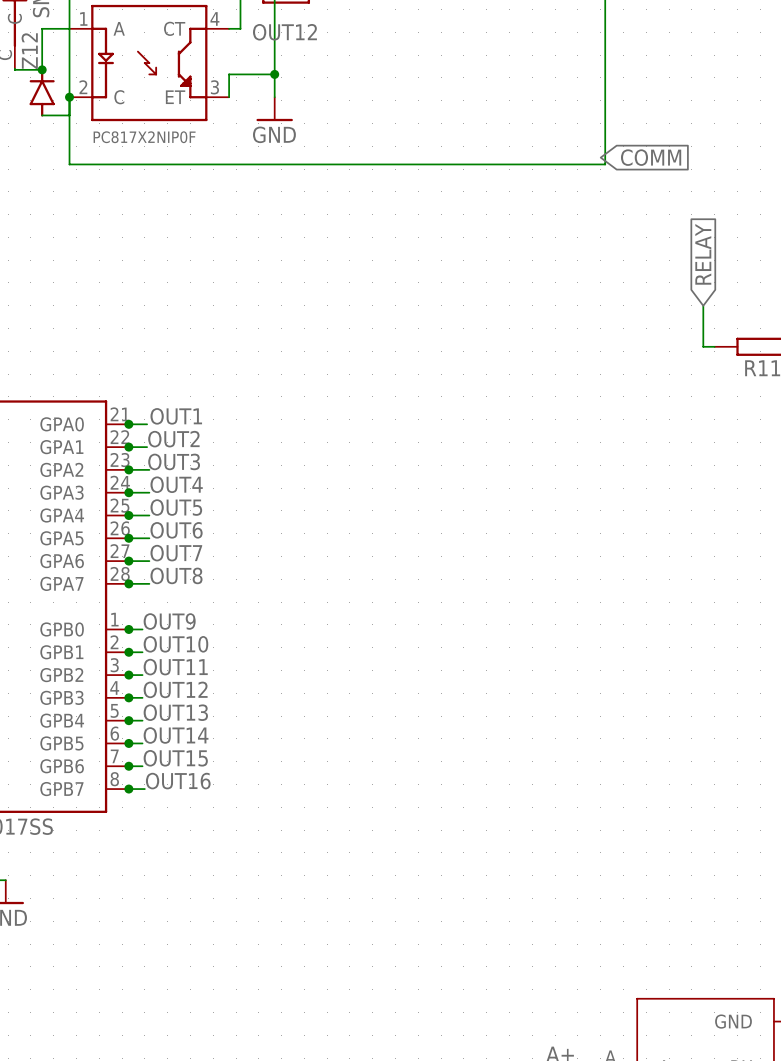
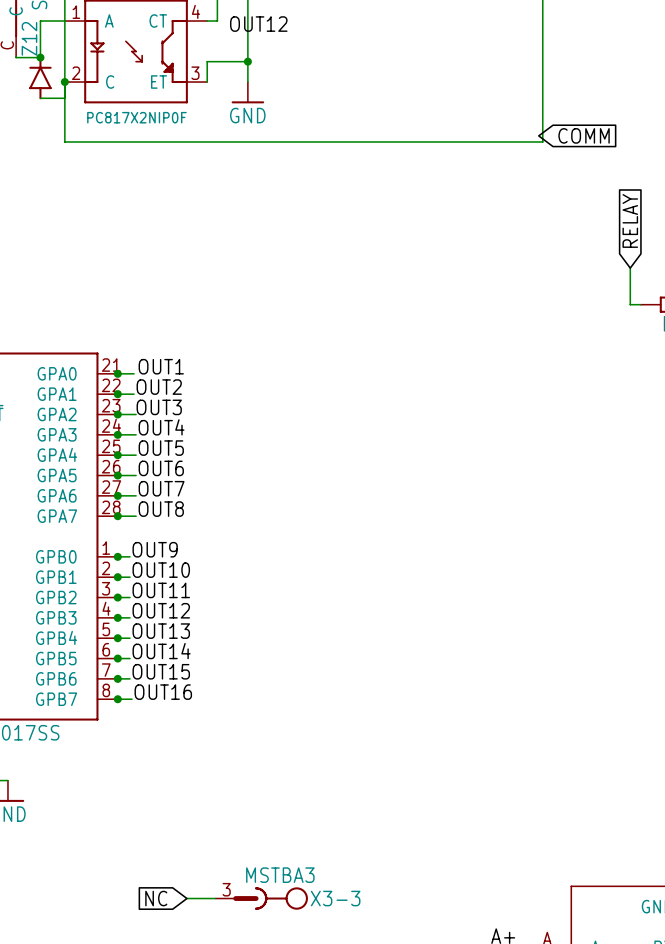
global label: none -> NC (156, 898)
wire: none -> (186, 898) (215, 898)
X3-3: none -> MSTBA3 (261, 898)

